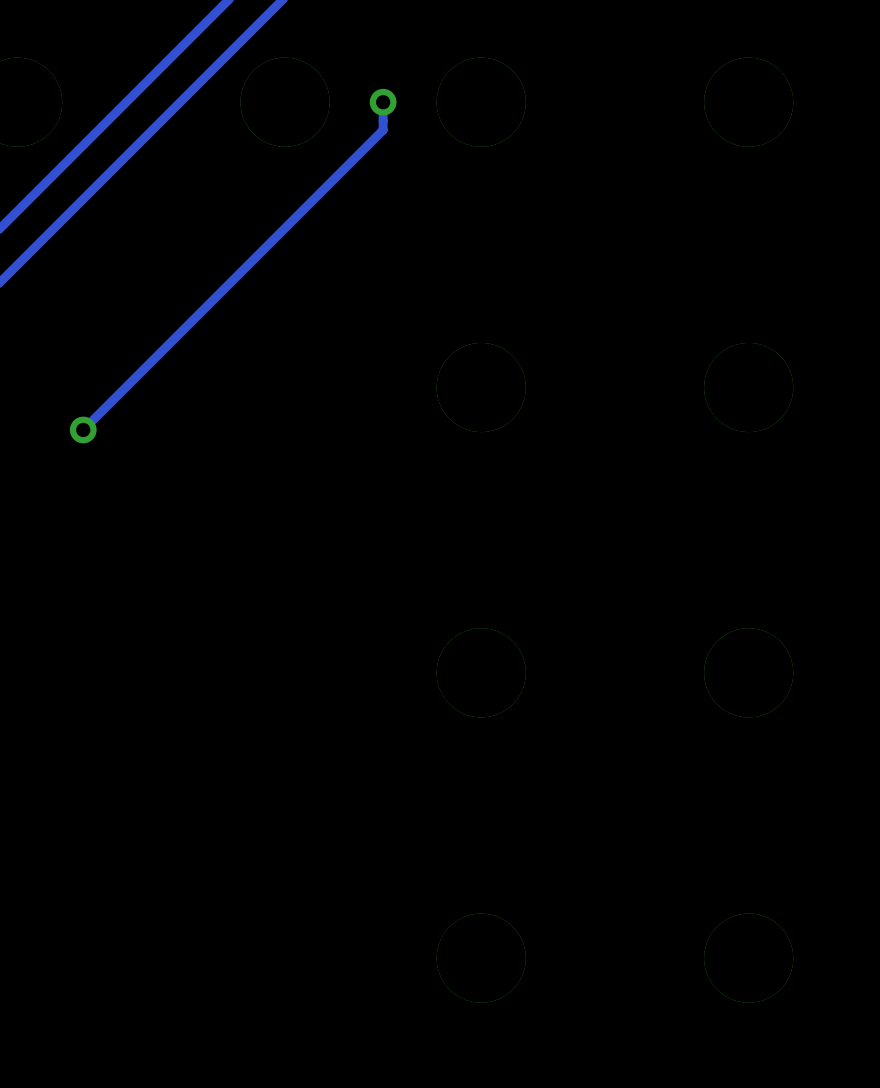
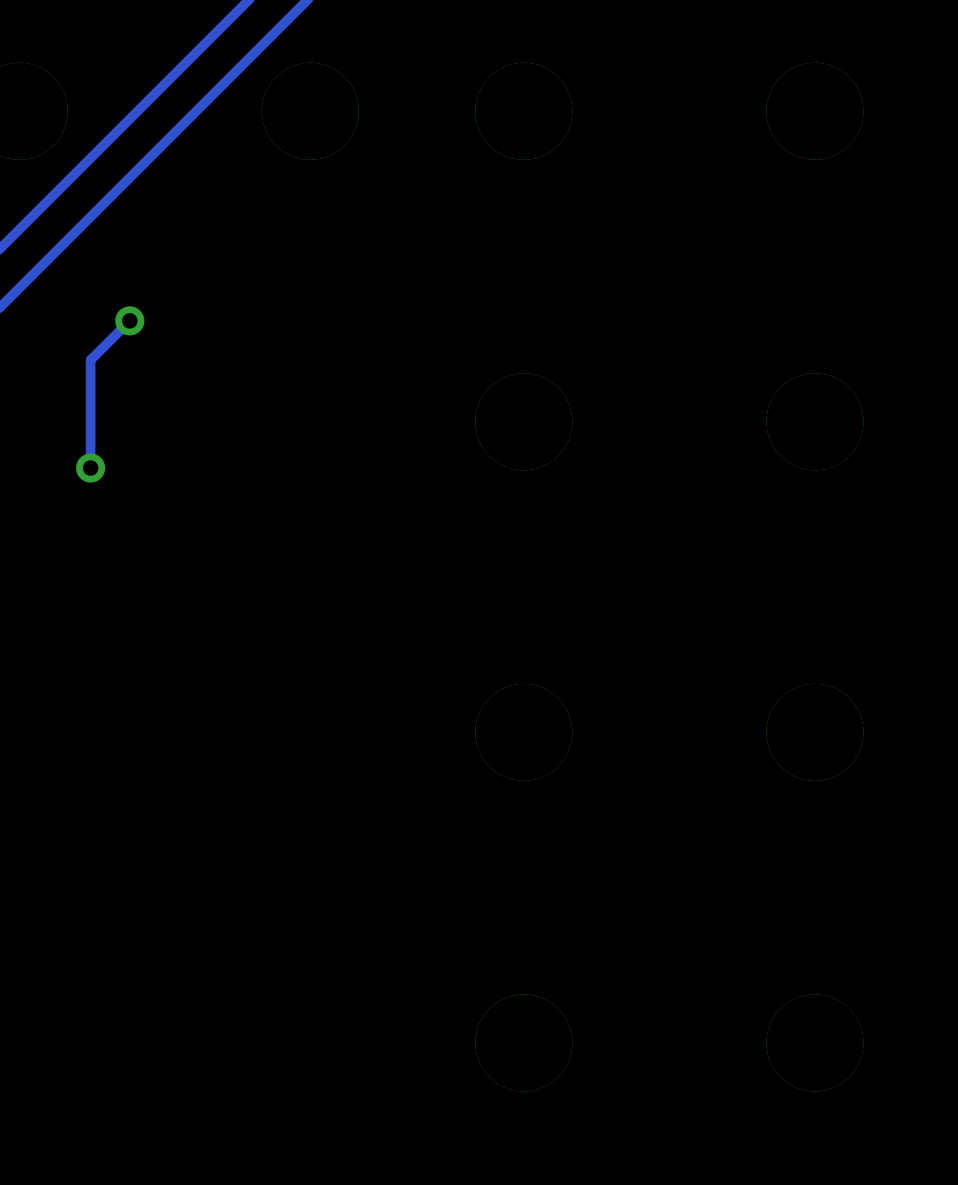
track: (383, 102) (383, 130) (83, 429) -> (129, 320) (90, 360) (90, 468)
via: (383, 102) -> none
via: none -> (129, 320)

